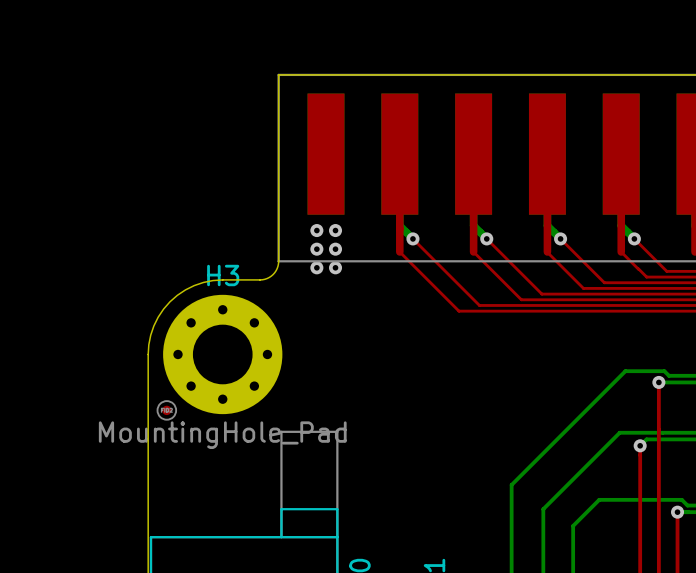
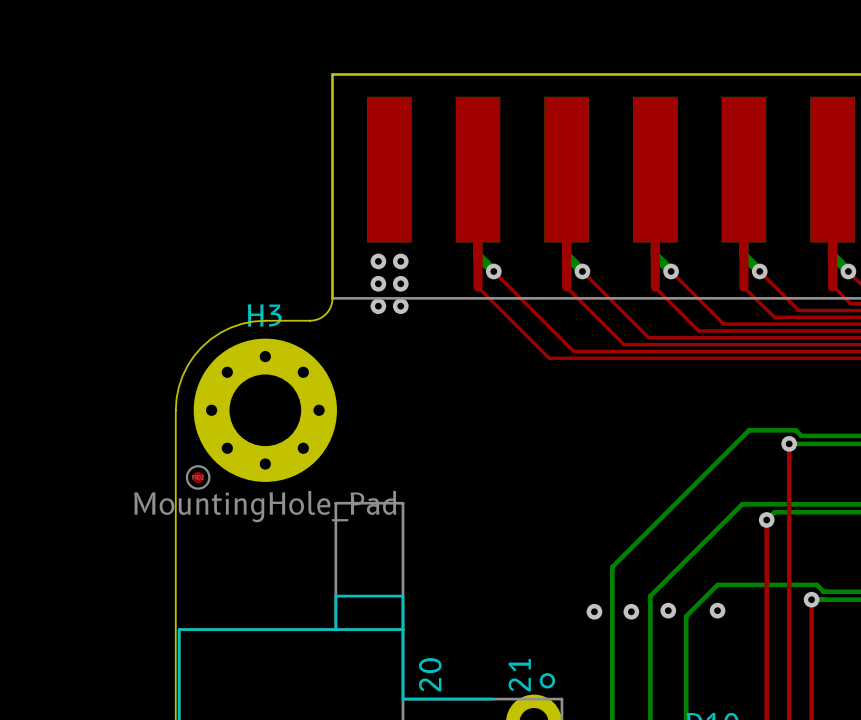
via: none -> (668, 610)
via: none -> (717, 610)
via: none -> (594, 611)
via: none -> (631, 611)

